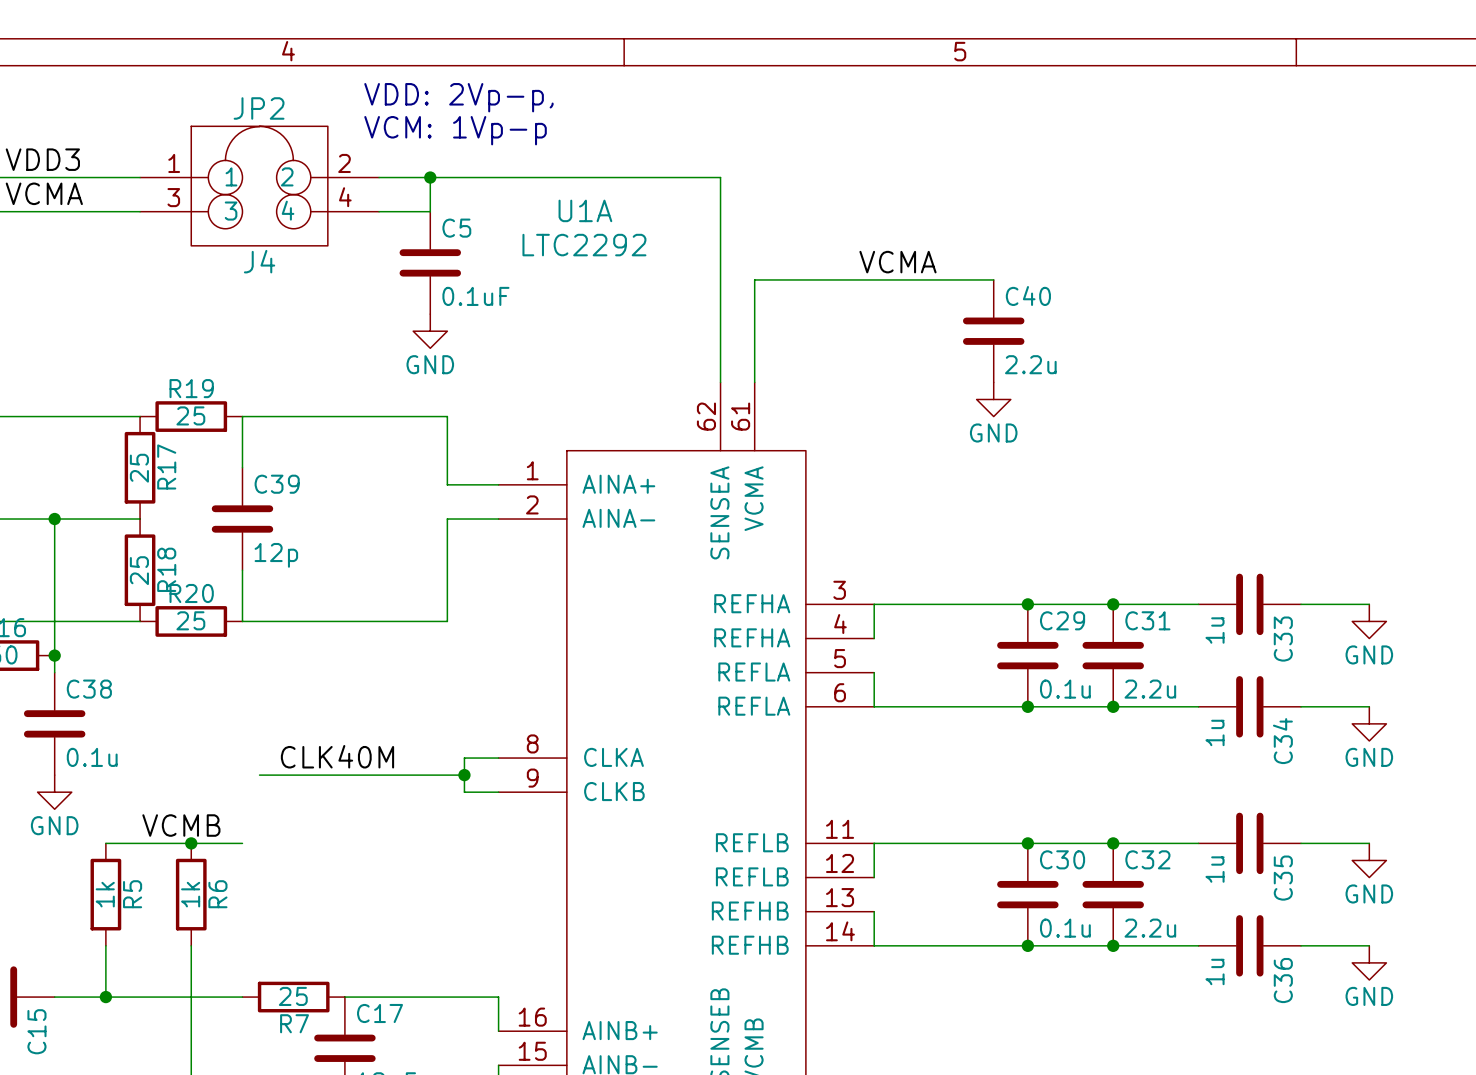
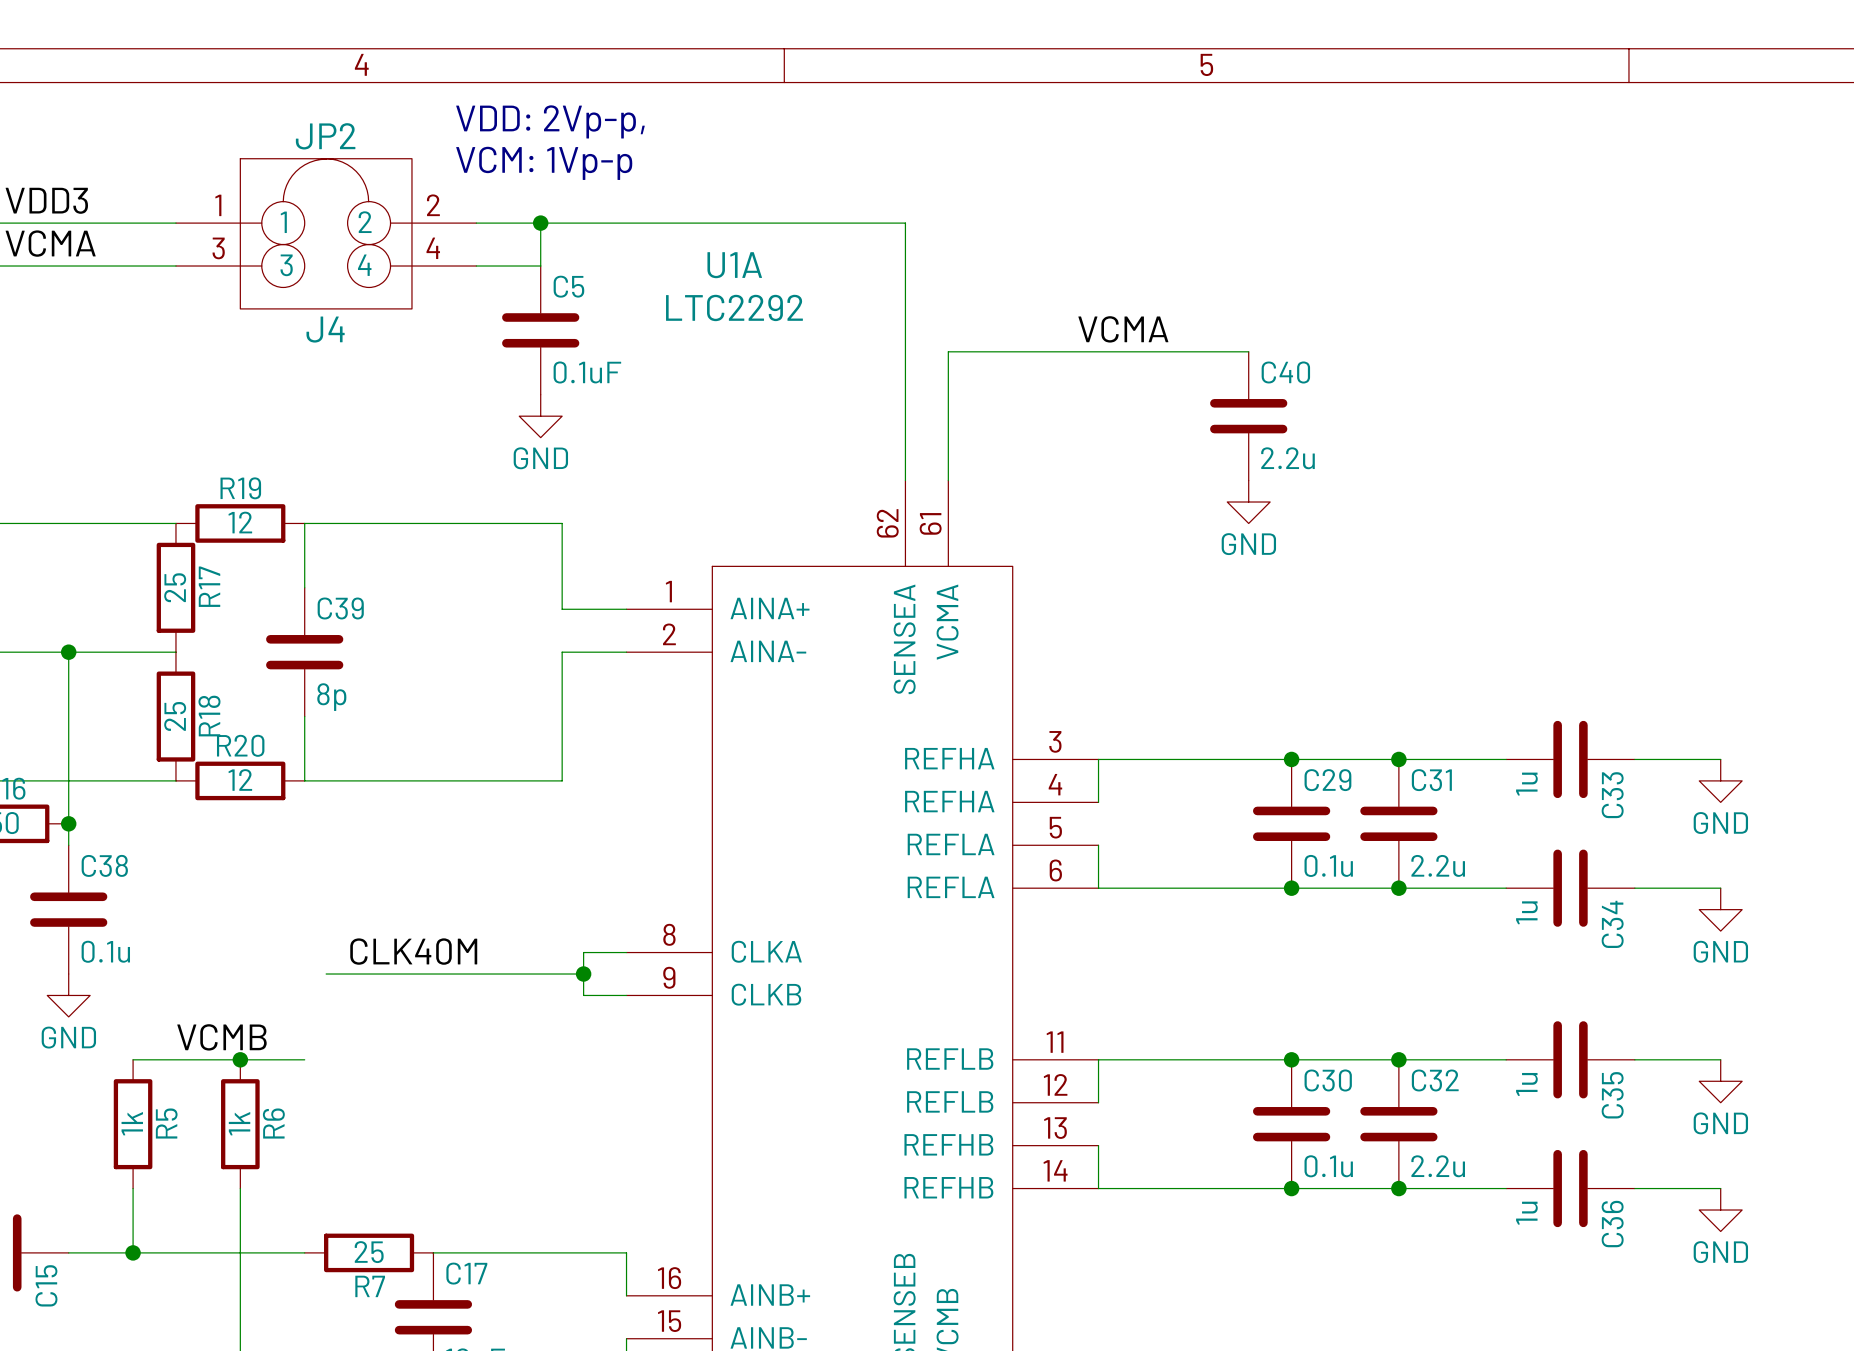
R19 value: 25 (190, 415) -> 12 (240, 522)
C39 value: 12p (276, 555) -> 8p (331, 697)
R20 value: 25 (190, 620) -> 12 (240, 779)

